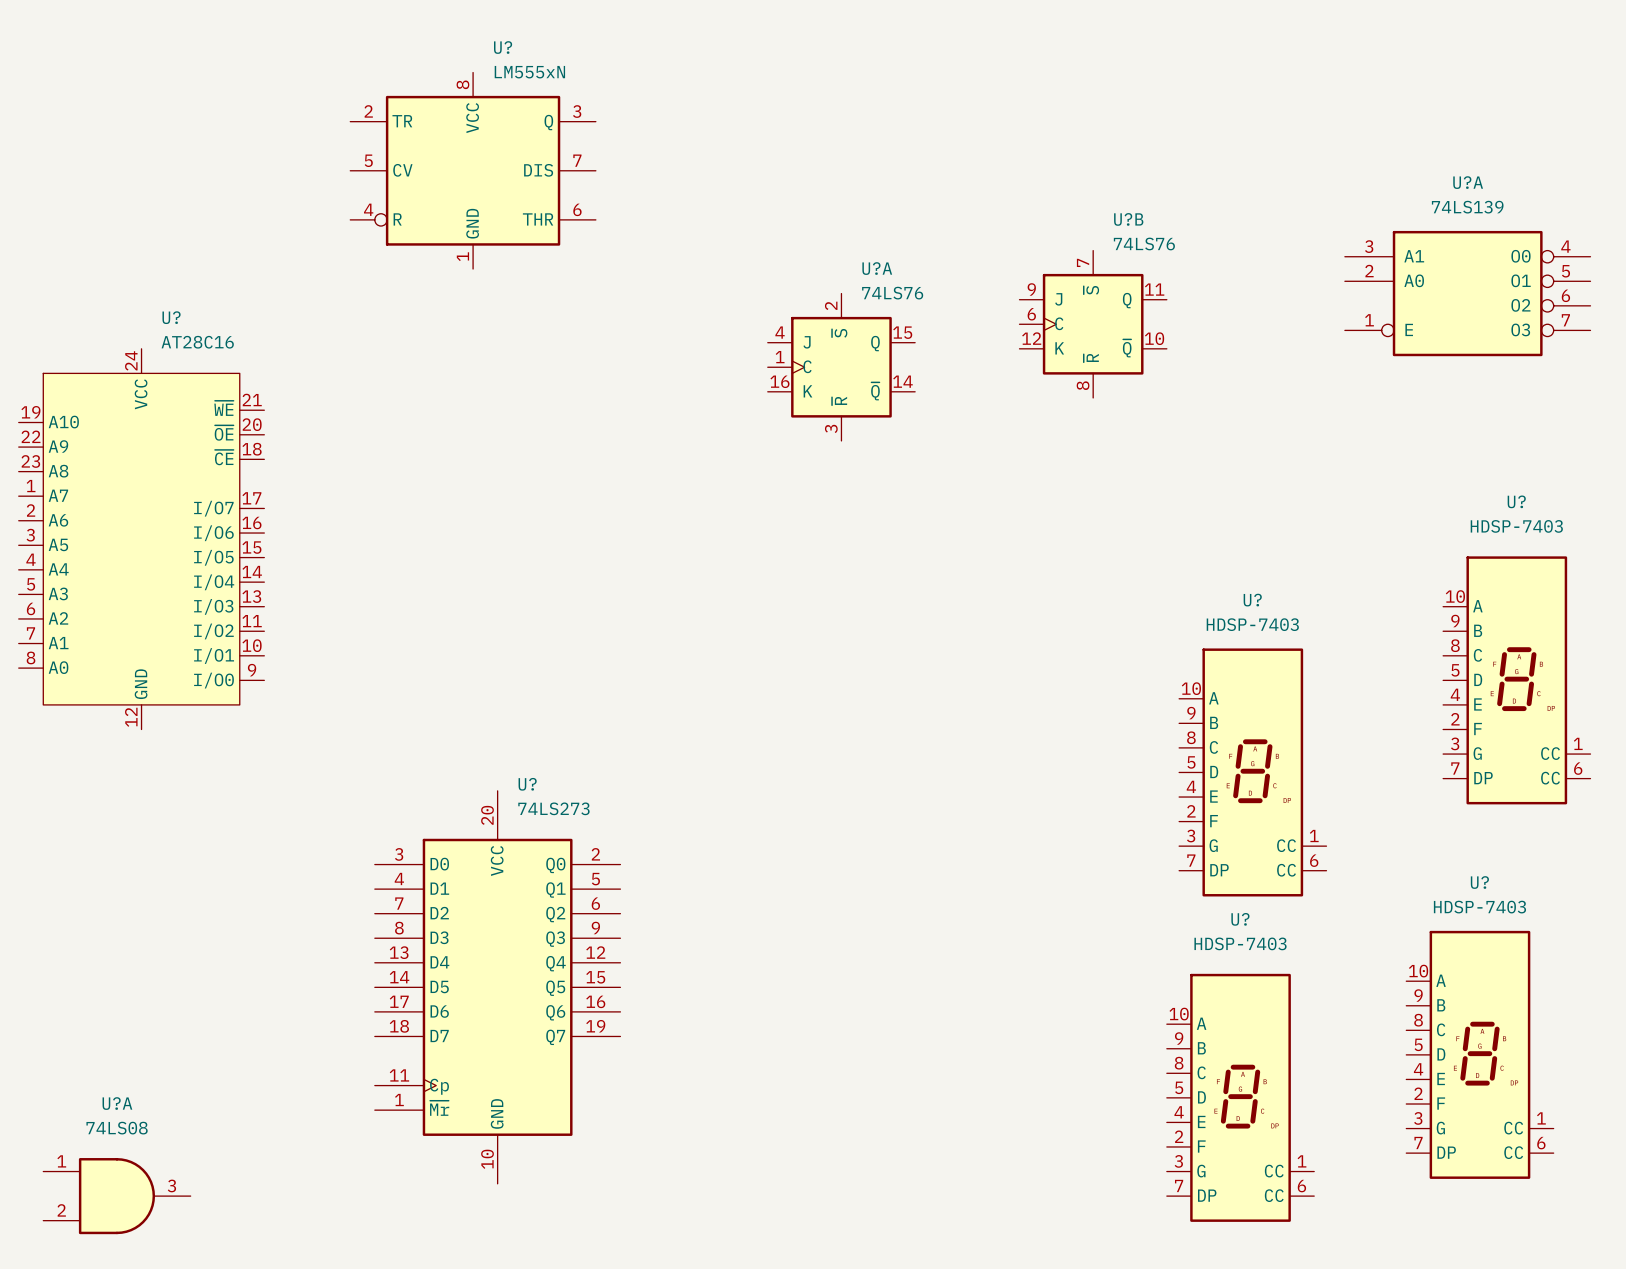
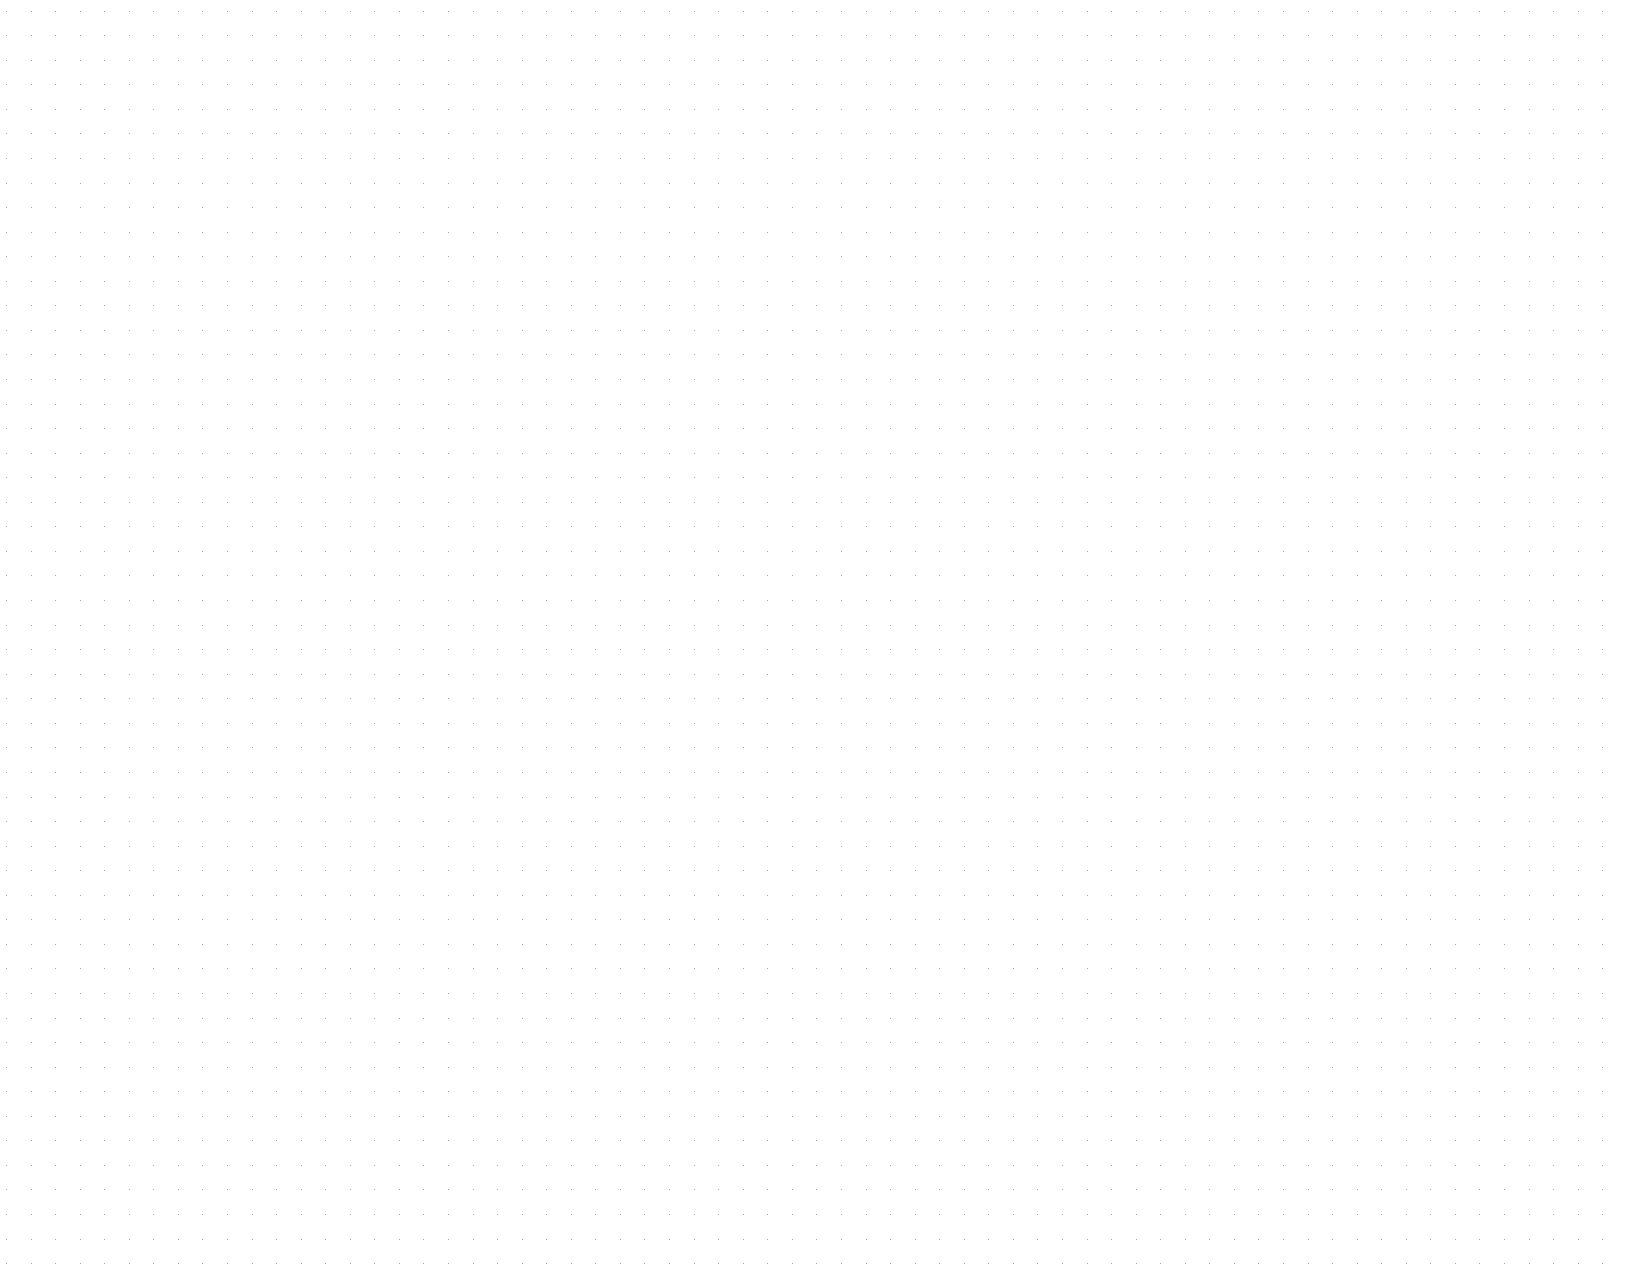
U?: LM555xN (473, 170) -> none
U?A: 74LS139 (1467, 293) -> none
U?B: 74LS76 (1093, 324) -> none
U?A: 74LS76 (841, 367) -> none
U?: AT28C16 (141, 539) -> none
U?: HDSP-7403 (1516, 680) -> none
U?: HDSP-7403 (1252, 772) -> none
U?: 74LS273 (497, 987) -> none
U?: HDSP-7403 (1479, 1054) -> none
U?: HDSP-7403 (1240, 1097) -> none
U?A: 74LS08 (116, 1196) -> none

